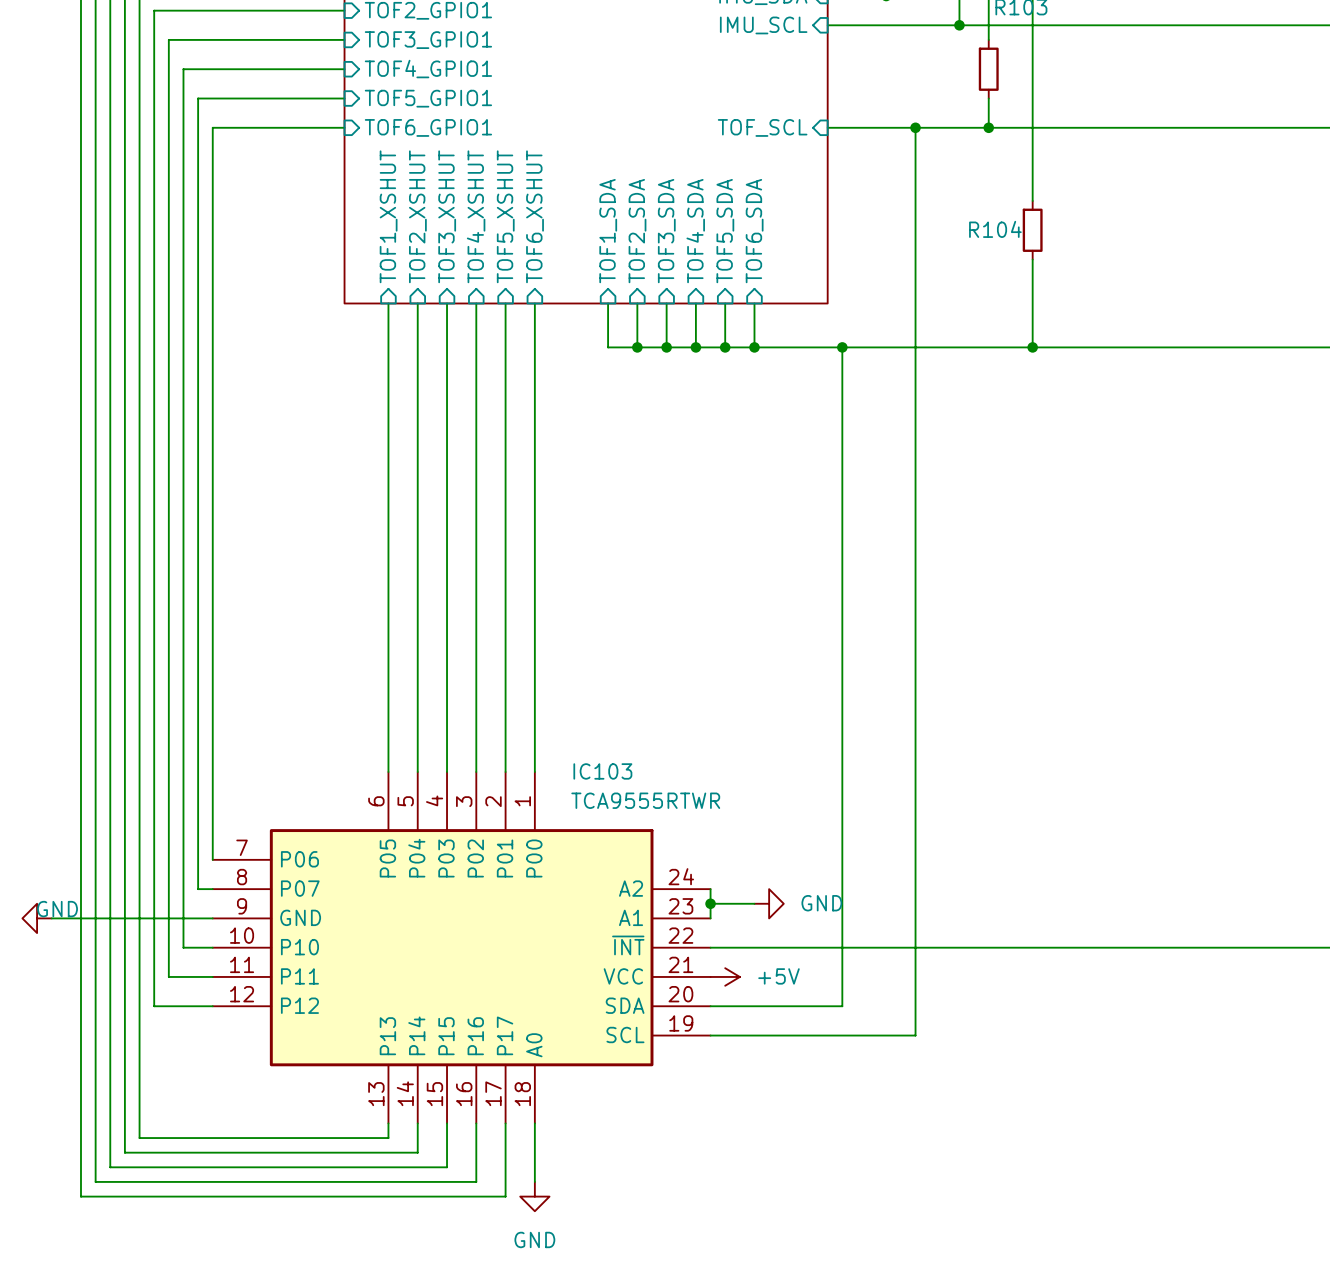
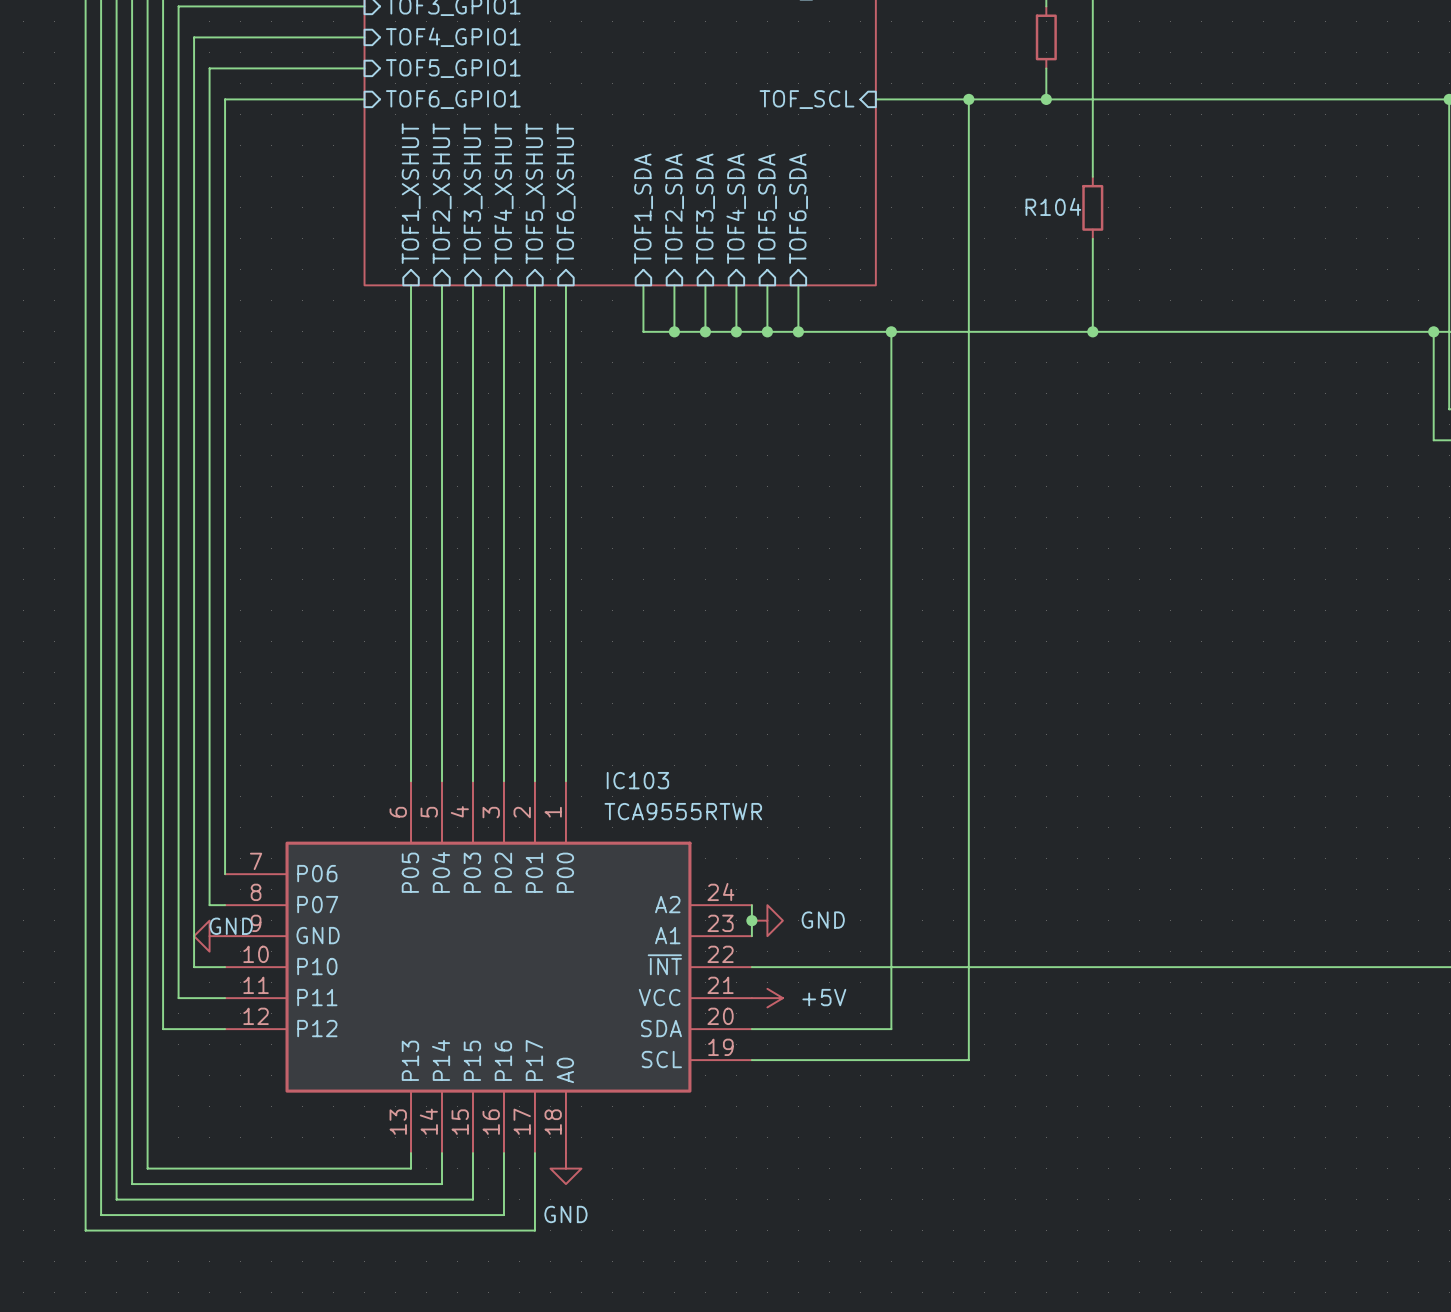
wire: (710, 903) (754, 903) -> none
power symbol position: GND (769, 903) -> GND (767, 920)
power symbol position: GND (37, 918) -> GND (209, 936)
wire: (51, 918) (212, 918) -> none
wire: (534, 1123) (534, 1181) -> none
power symbol position: GND (534, 1196) -> GND (565, 1168)

